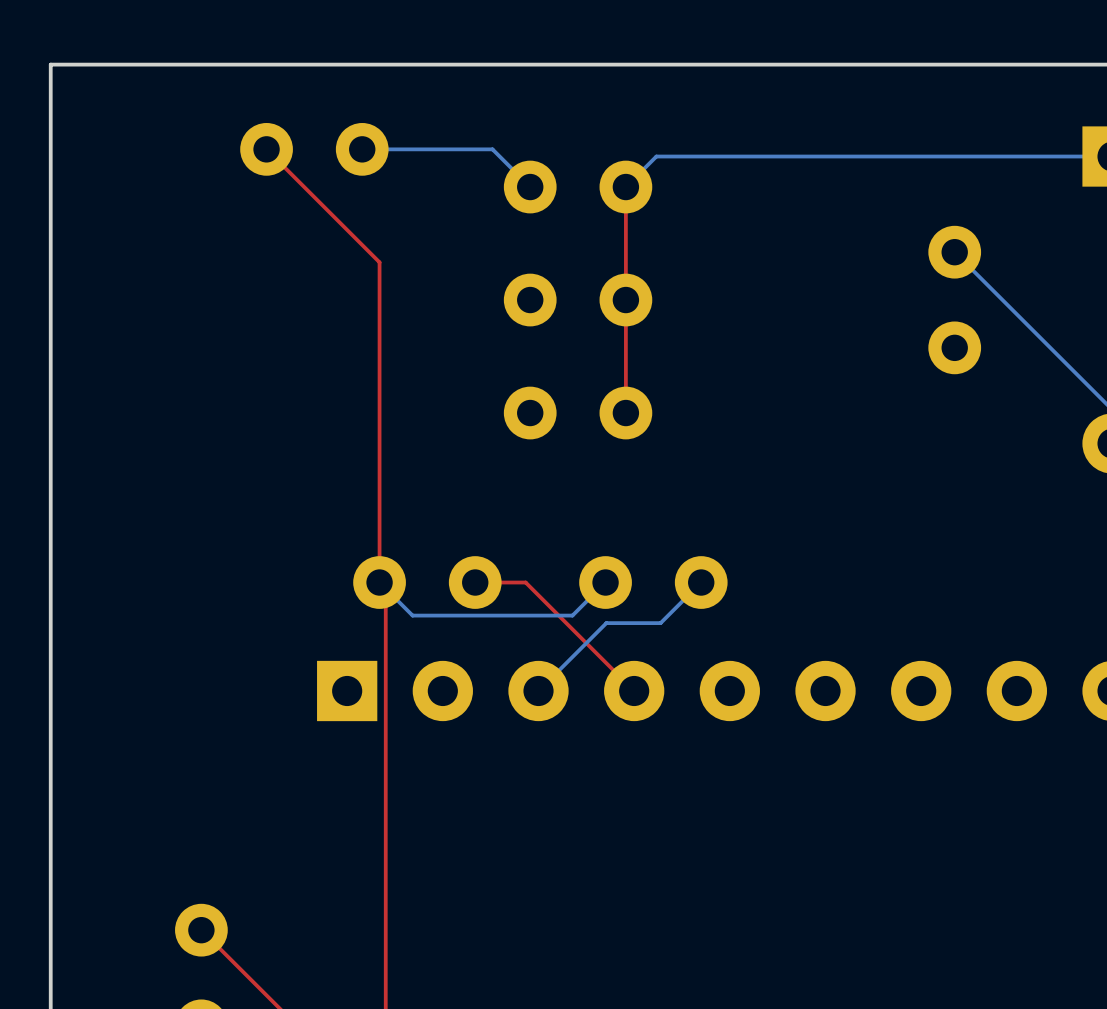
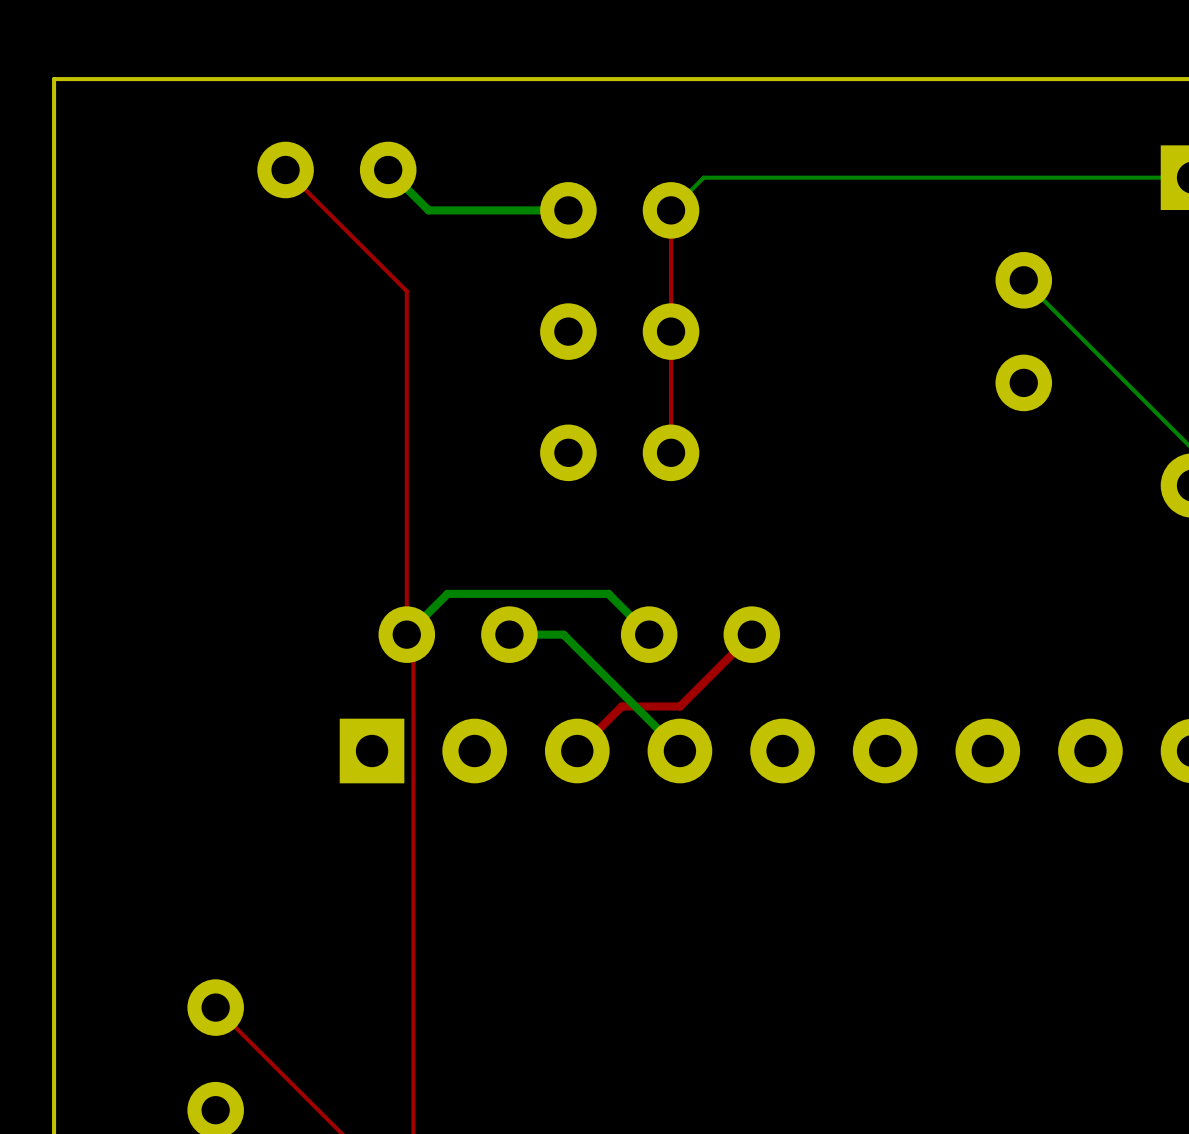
bottom track: (362, 149) (492, 149) (530, 187) -> (388, 169) (428, 210) (568, 210)
top track: (475, 582) (525, 582) (634, 691) -> none
bottom track: none -> (509, 634) (563, 634) (679, 751)
bottom track: (605, 582) (572, 615) (412, 615) (379, 582) -> (649, 634) (608, 593) (447, 593) (406, 634)
top track: none -> (751, 634) (679, 706) (621, 706) (577, 751)
bottom track: (701, 582) (660, 623) (606, 623) (538, 691) -> none

